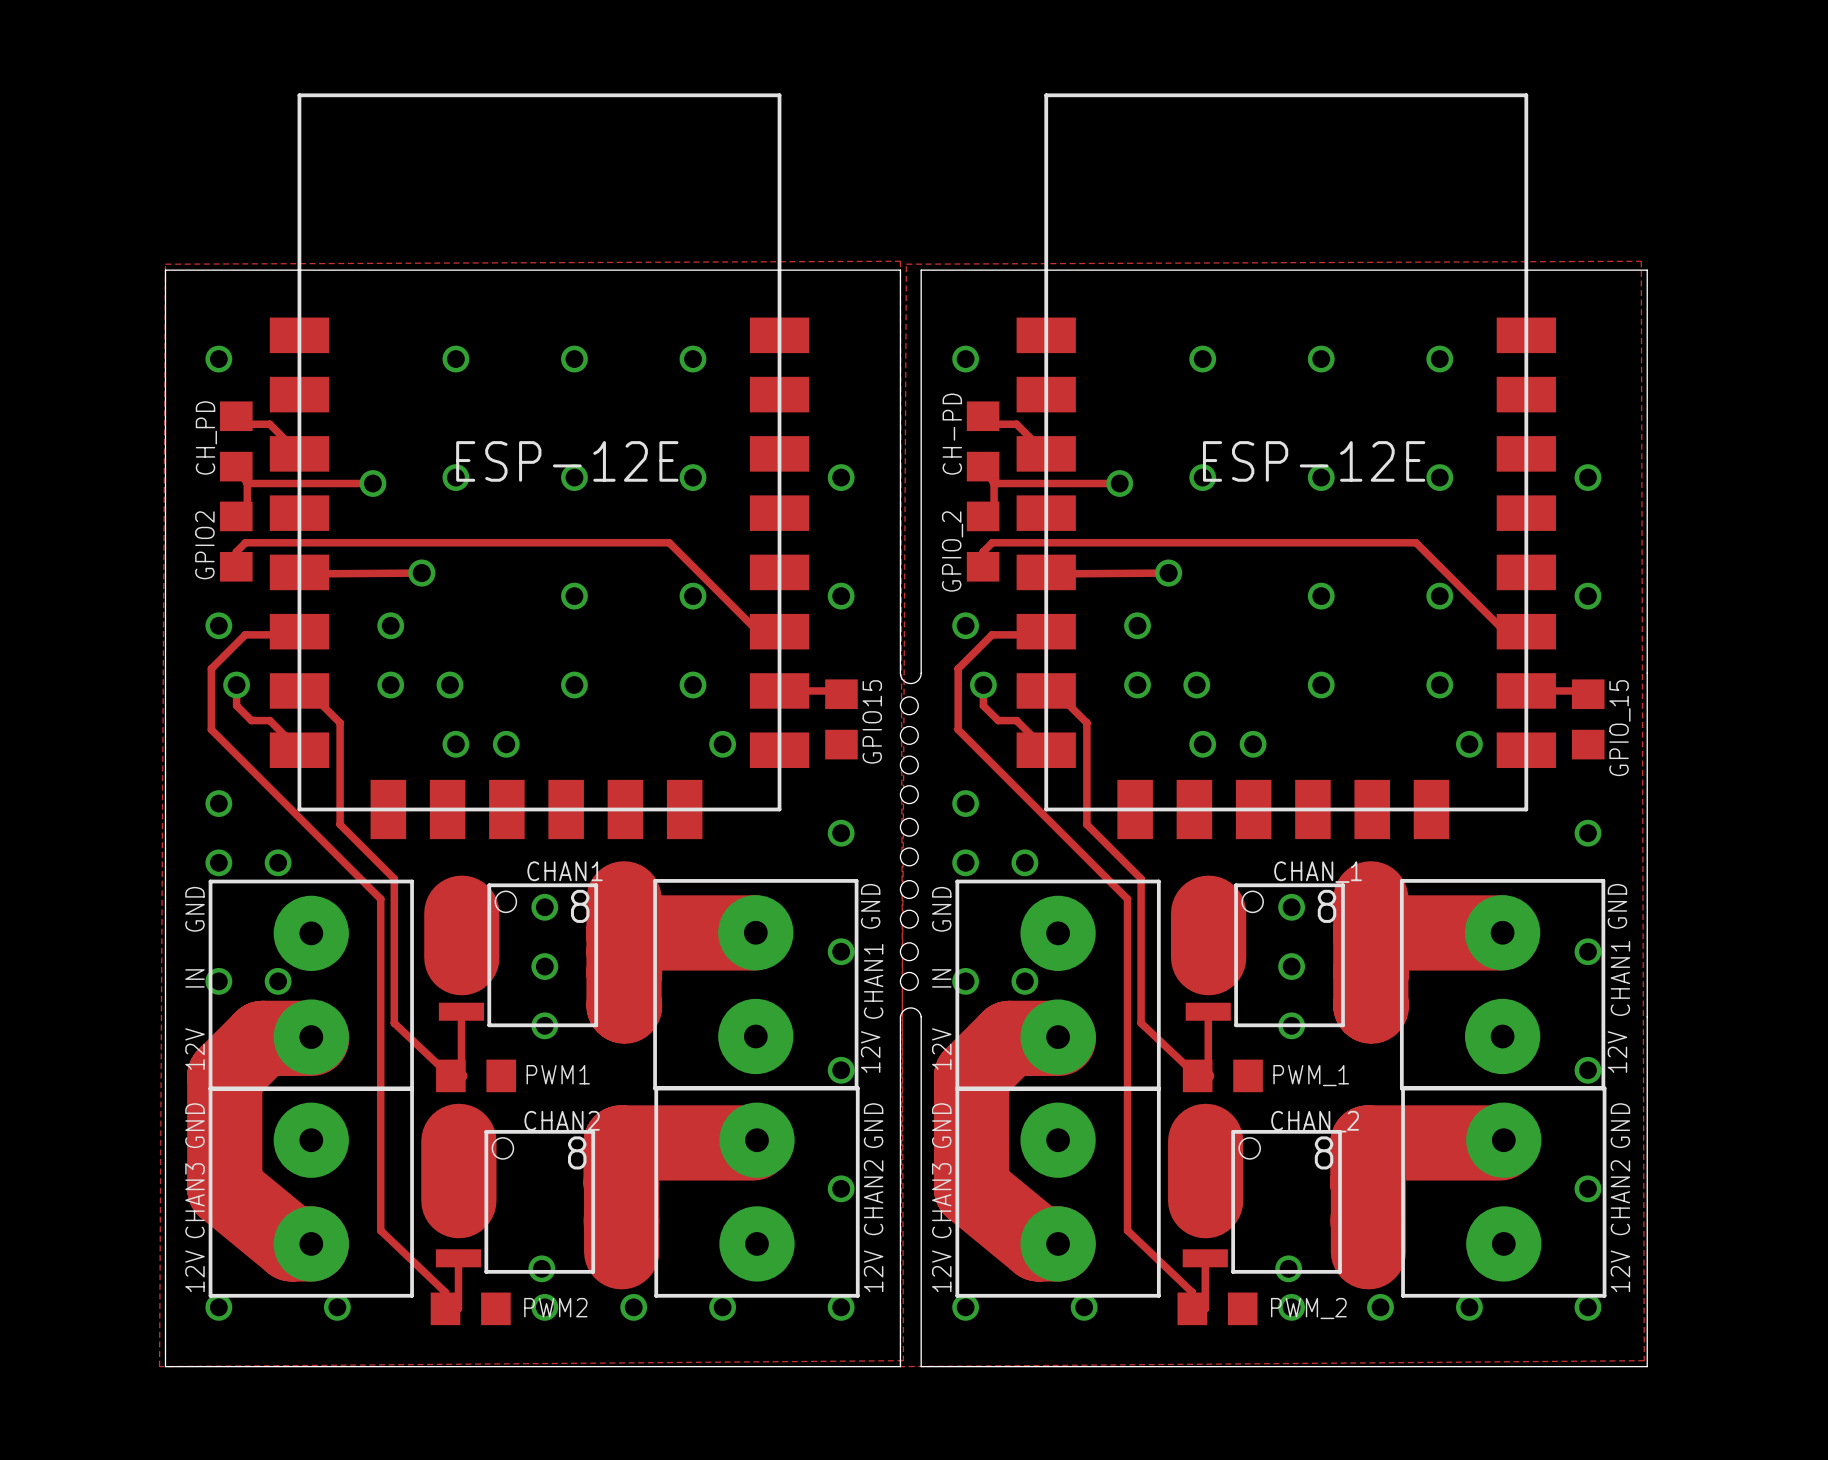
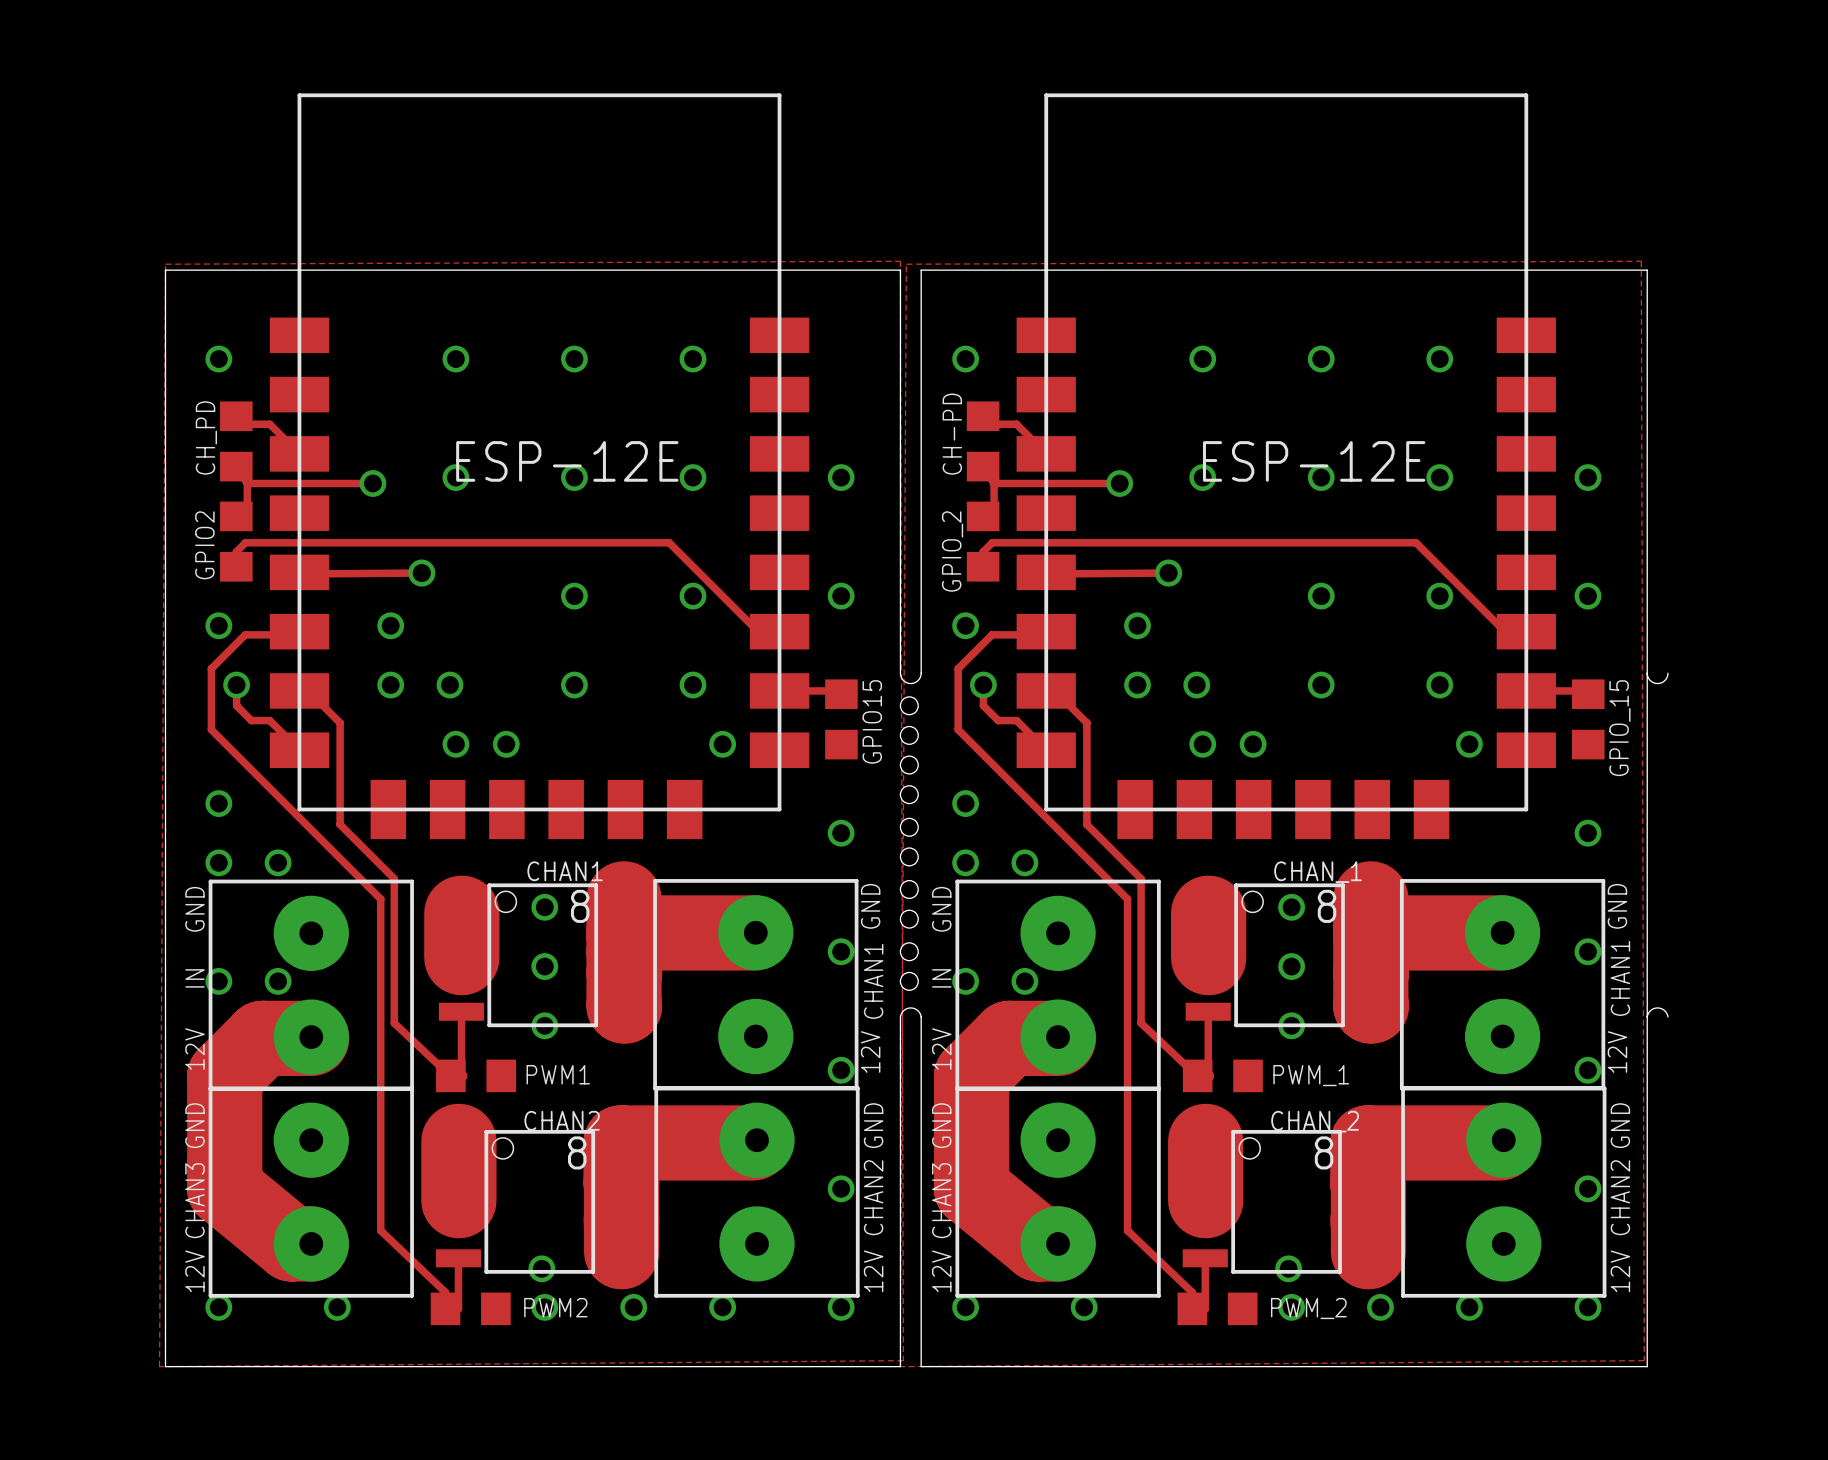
board edge: none -> (1647, 673) (1650, 680) (1657, 683) (1664, 680) (1667, 673)
board edge: none -> (1647, 1016) (1651, 1010) (1657, 1007) (1663, 1010) (1667, 1016)

